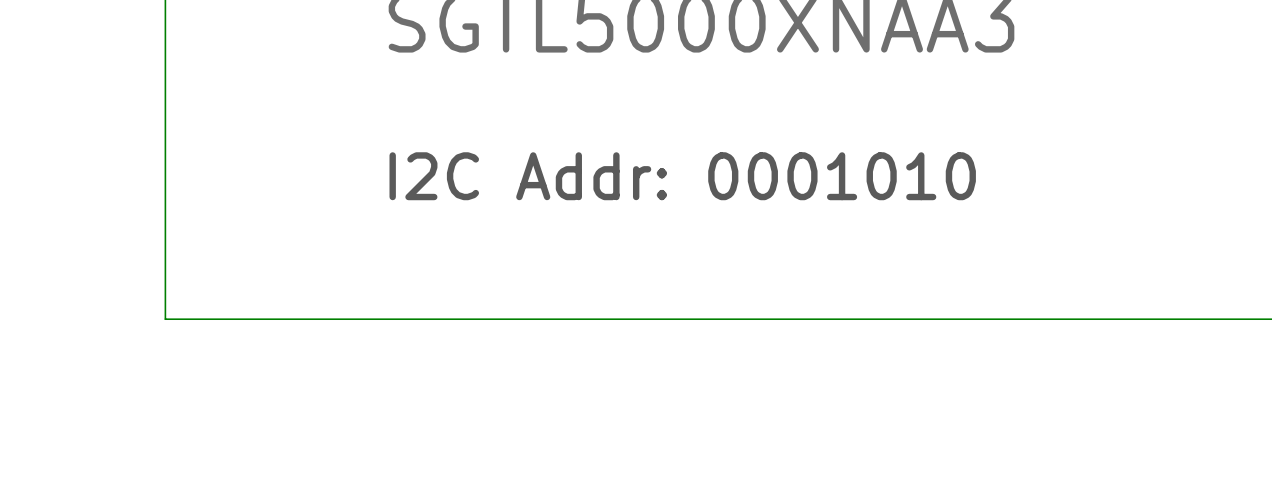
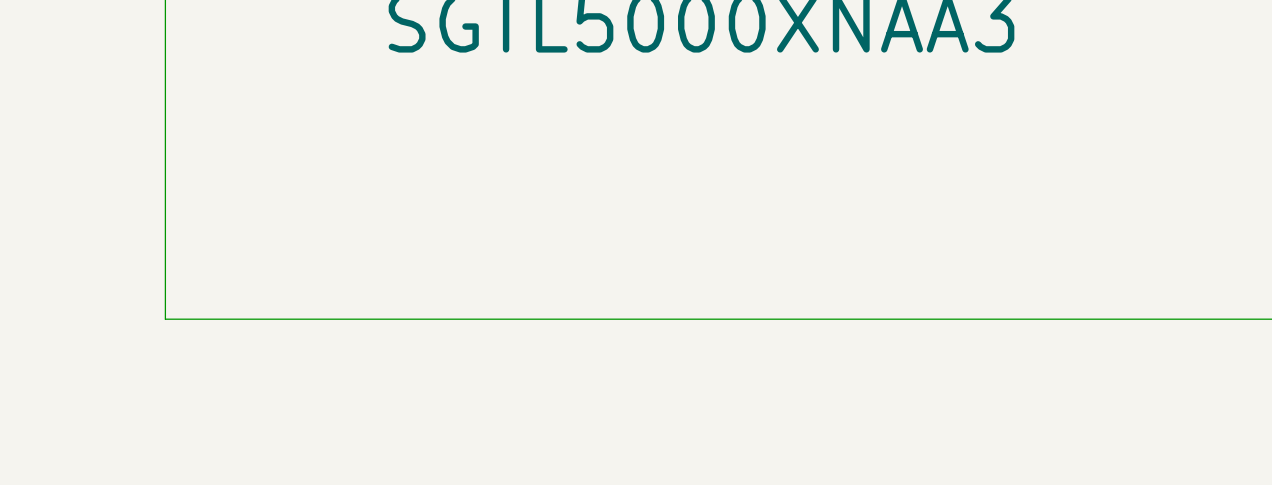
text: I2C Addr: 0001010 (682, 176) -> none

